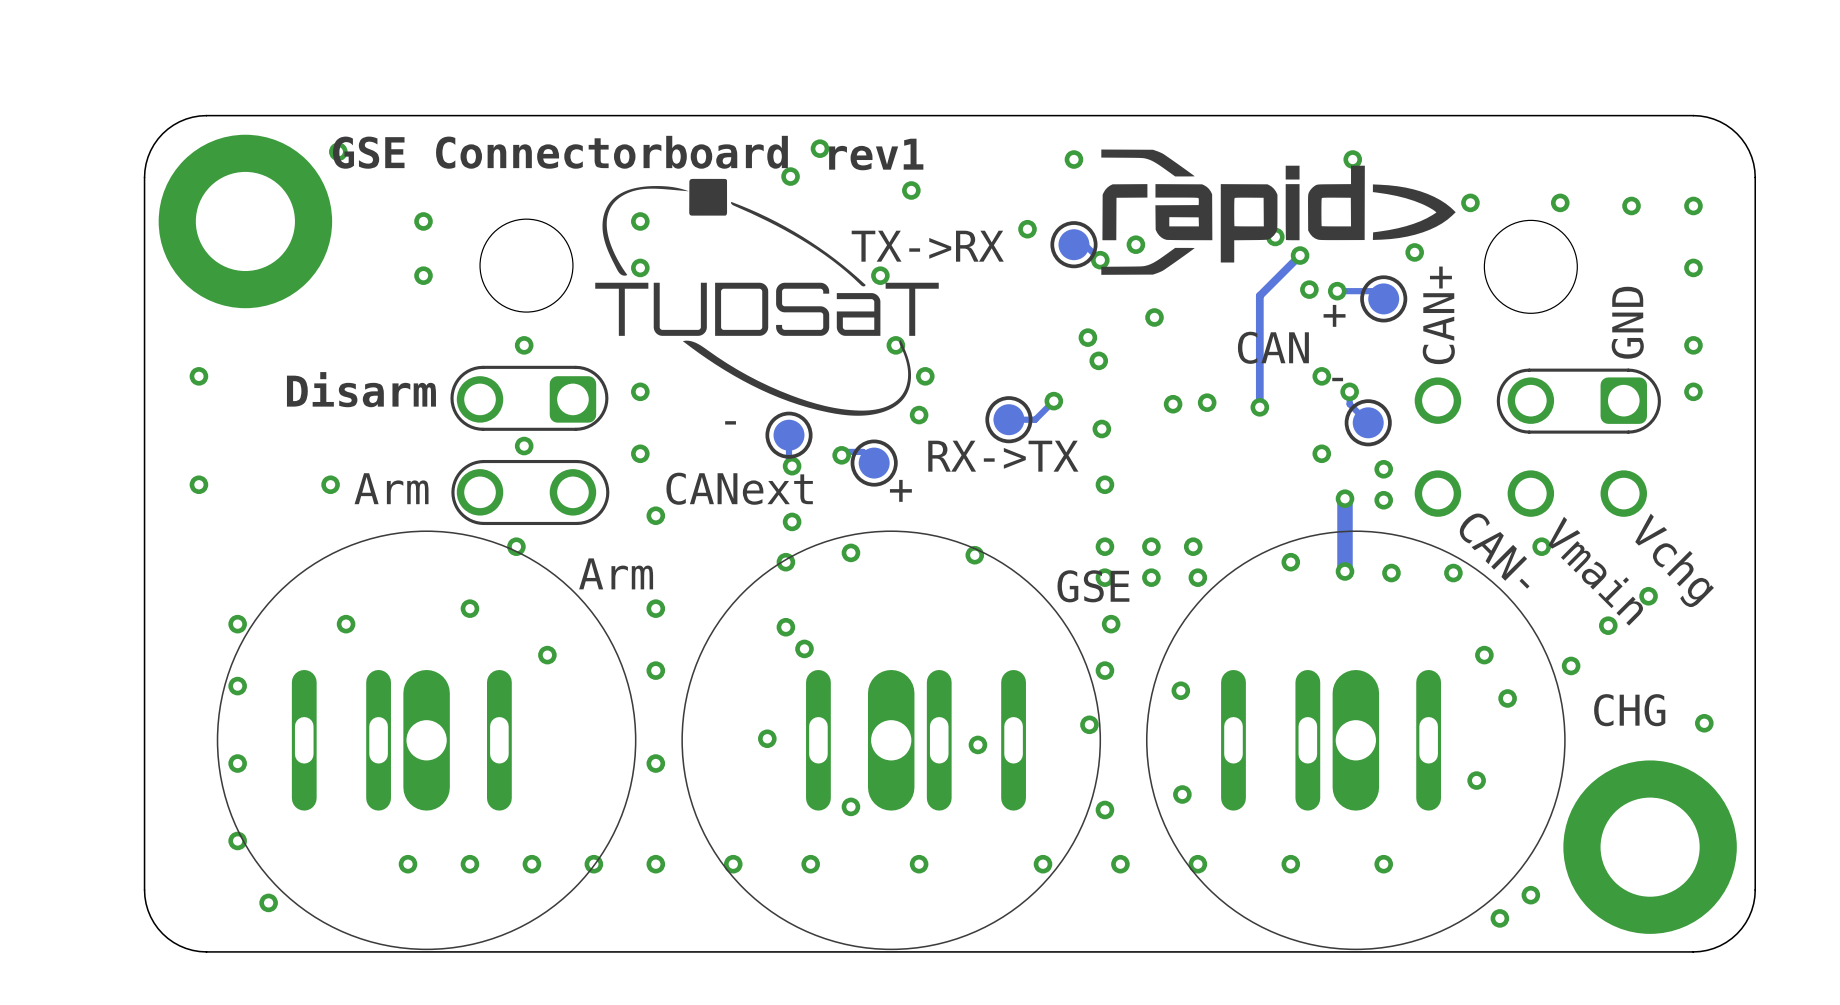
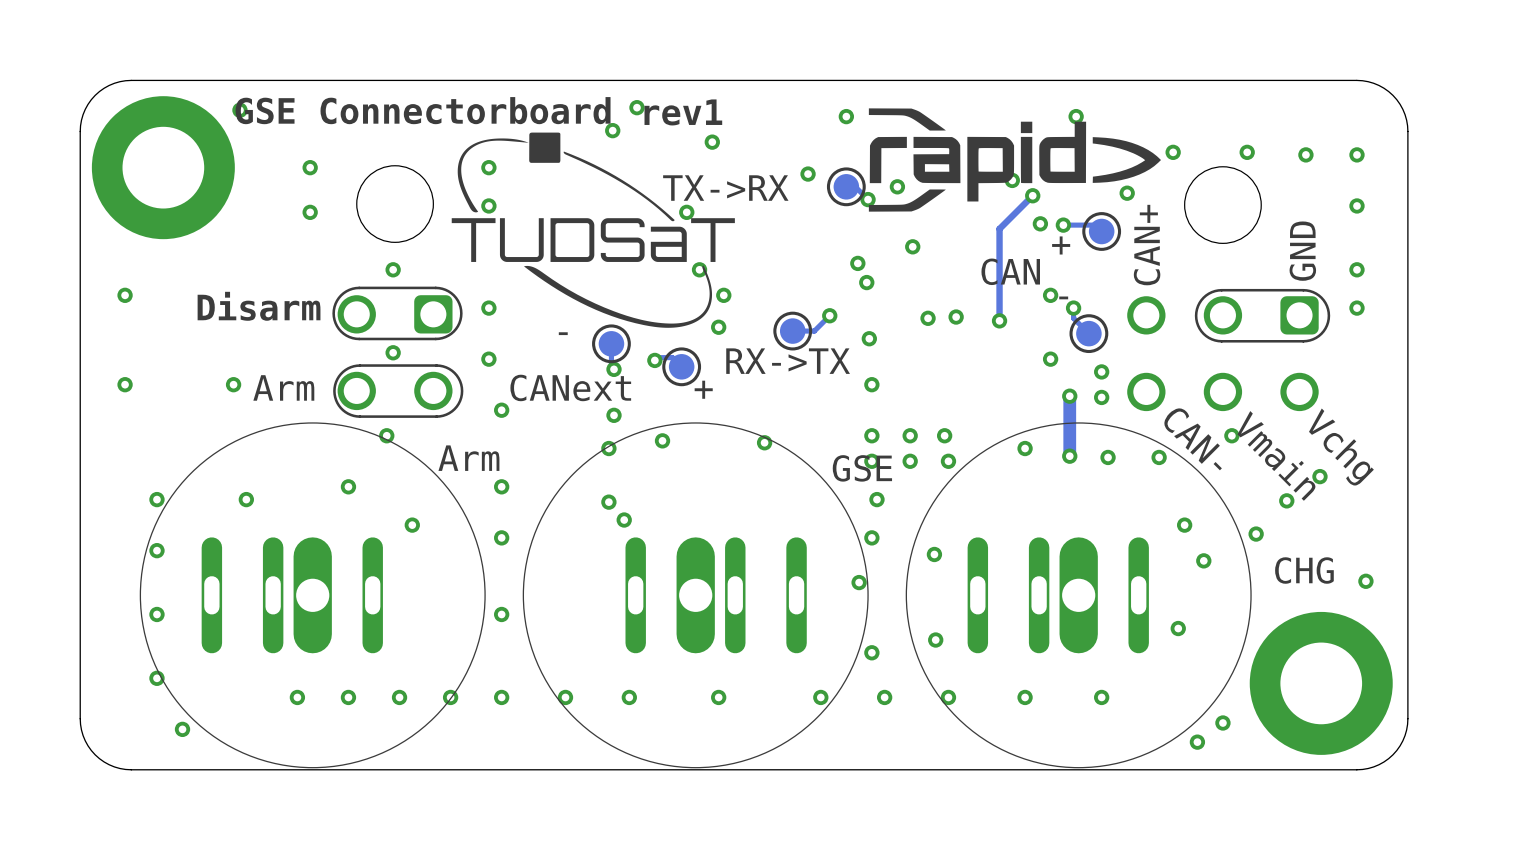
via: (767, 738) -> none
via: (977, 744) -> none
via: (850, 806) -> none

